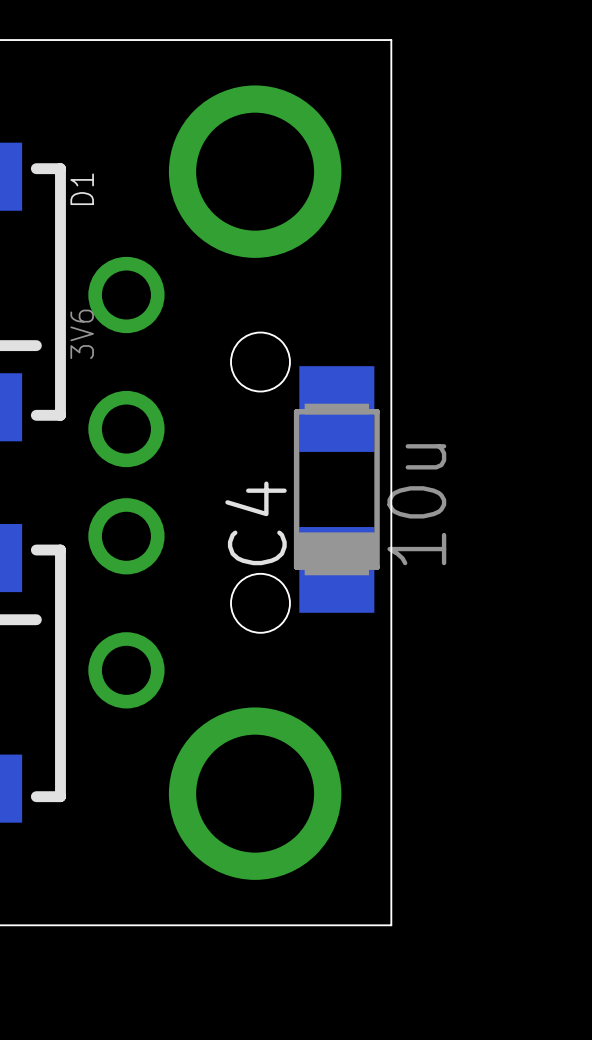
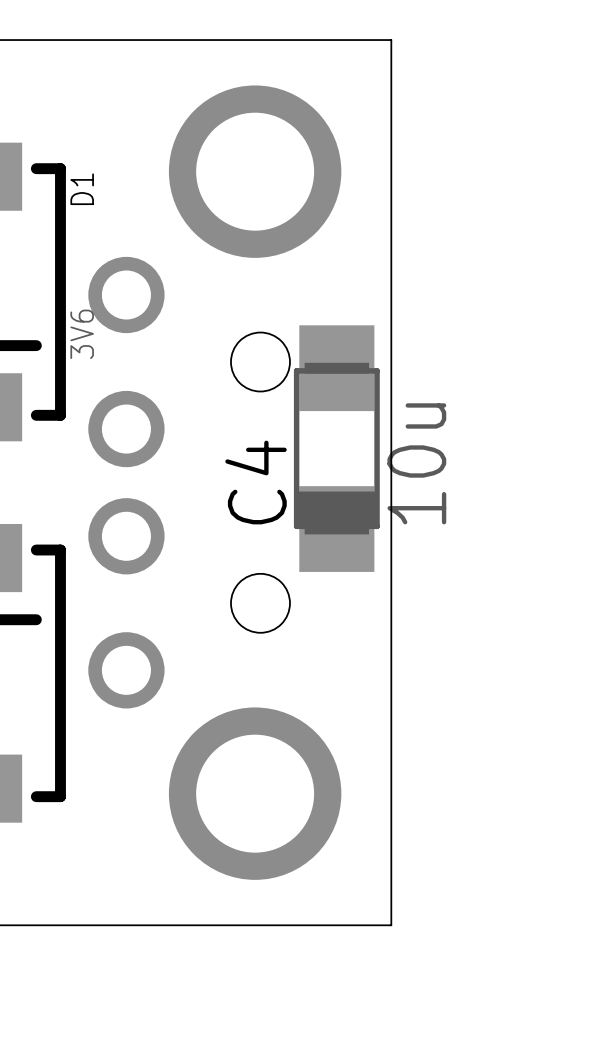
C4 position: (336, 489) -> (336, 448)

